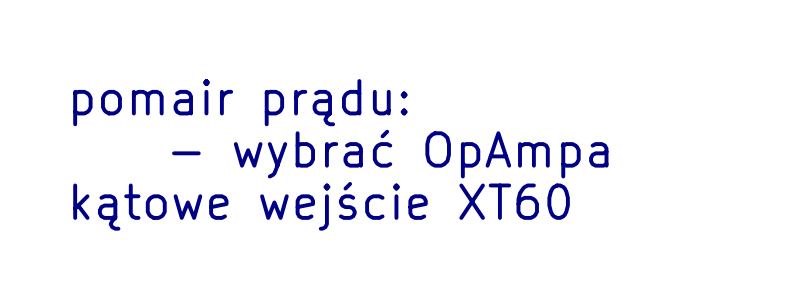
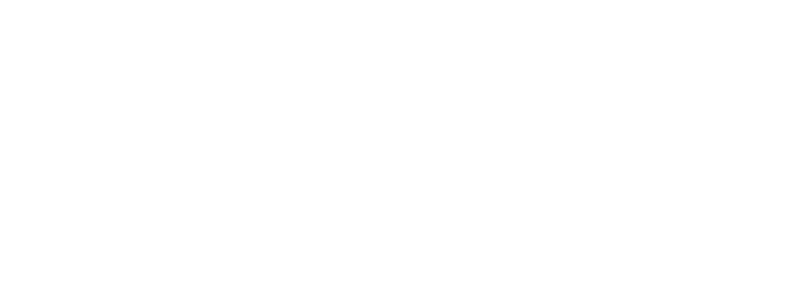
text: pomair prądu: (240, 102) -> none
text: - wybrać OpAmpa (390, 154) -> none
text: kątowe wejście XT60 (321, 206) -> none

